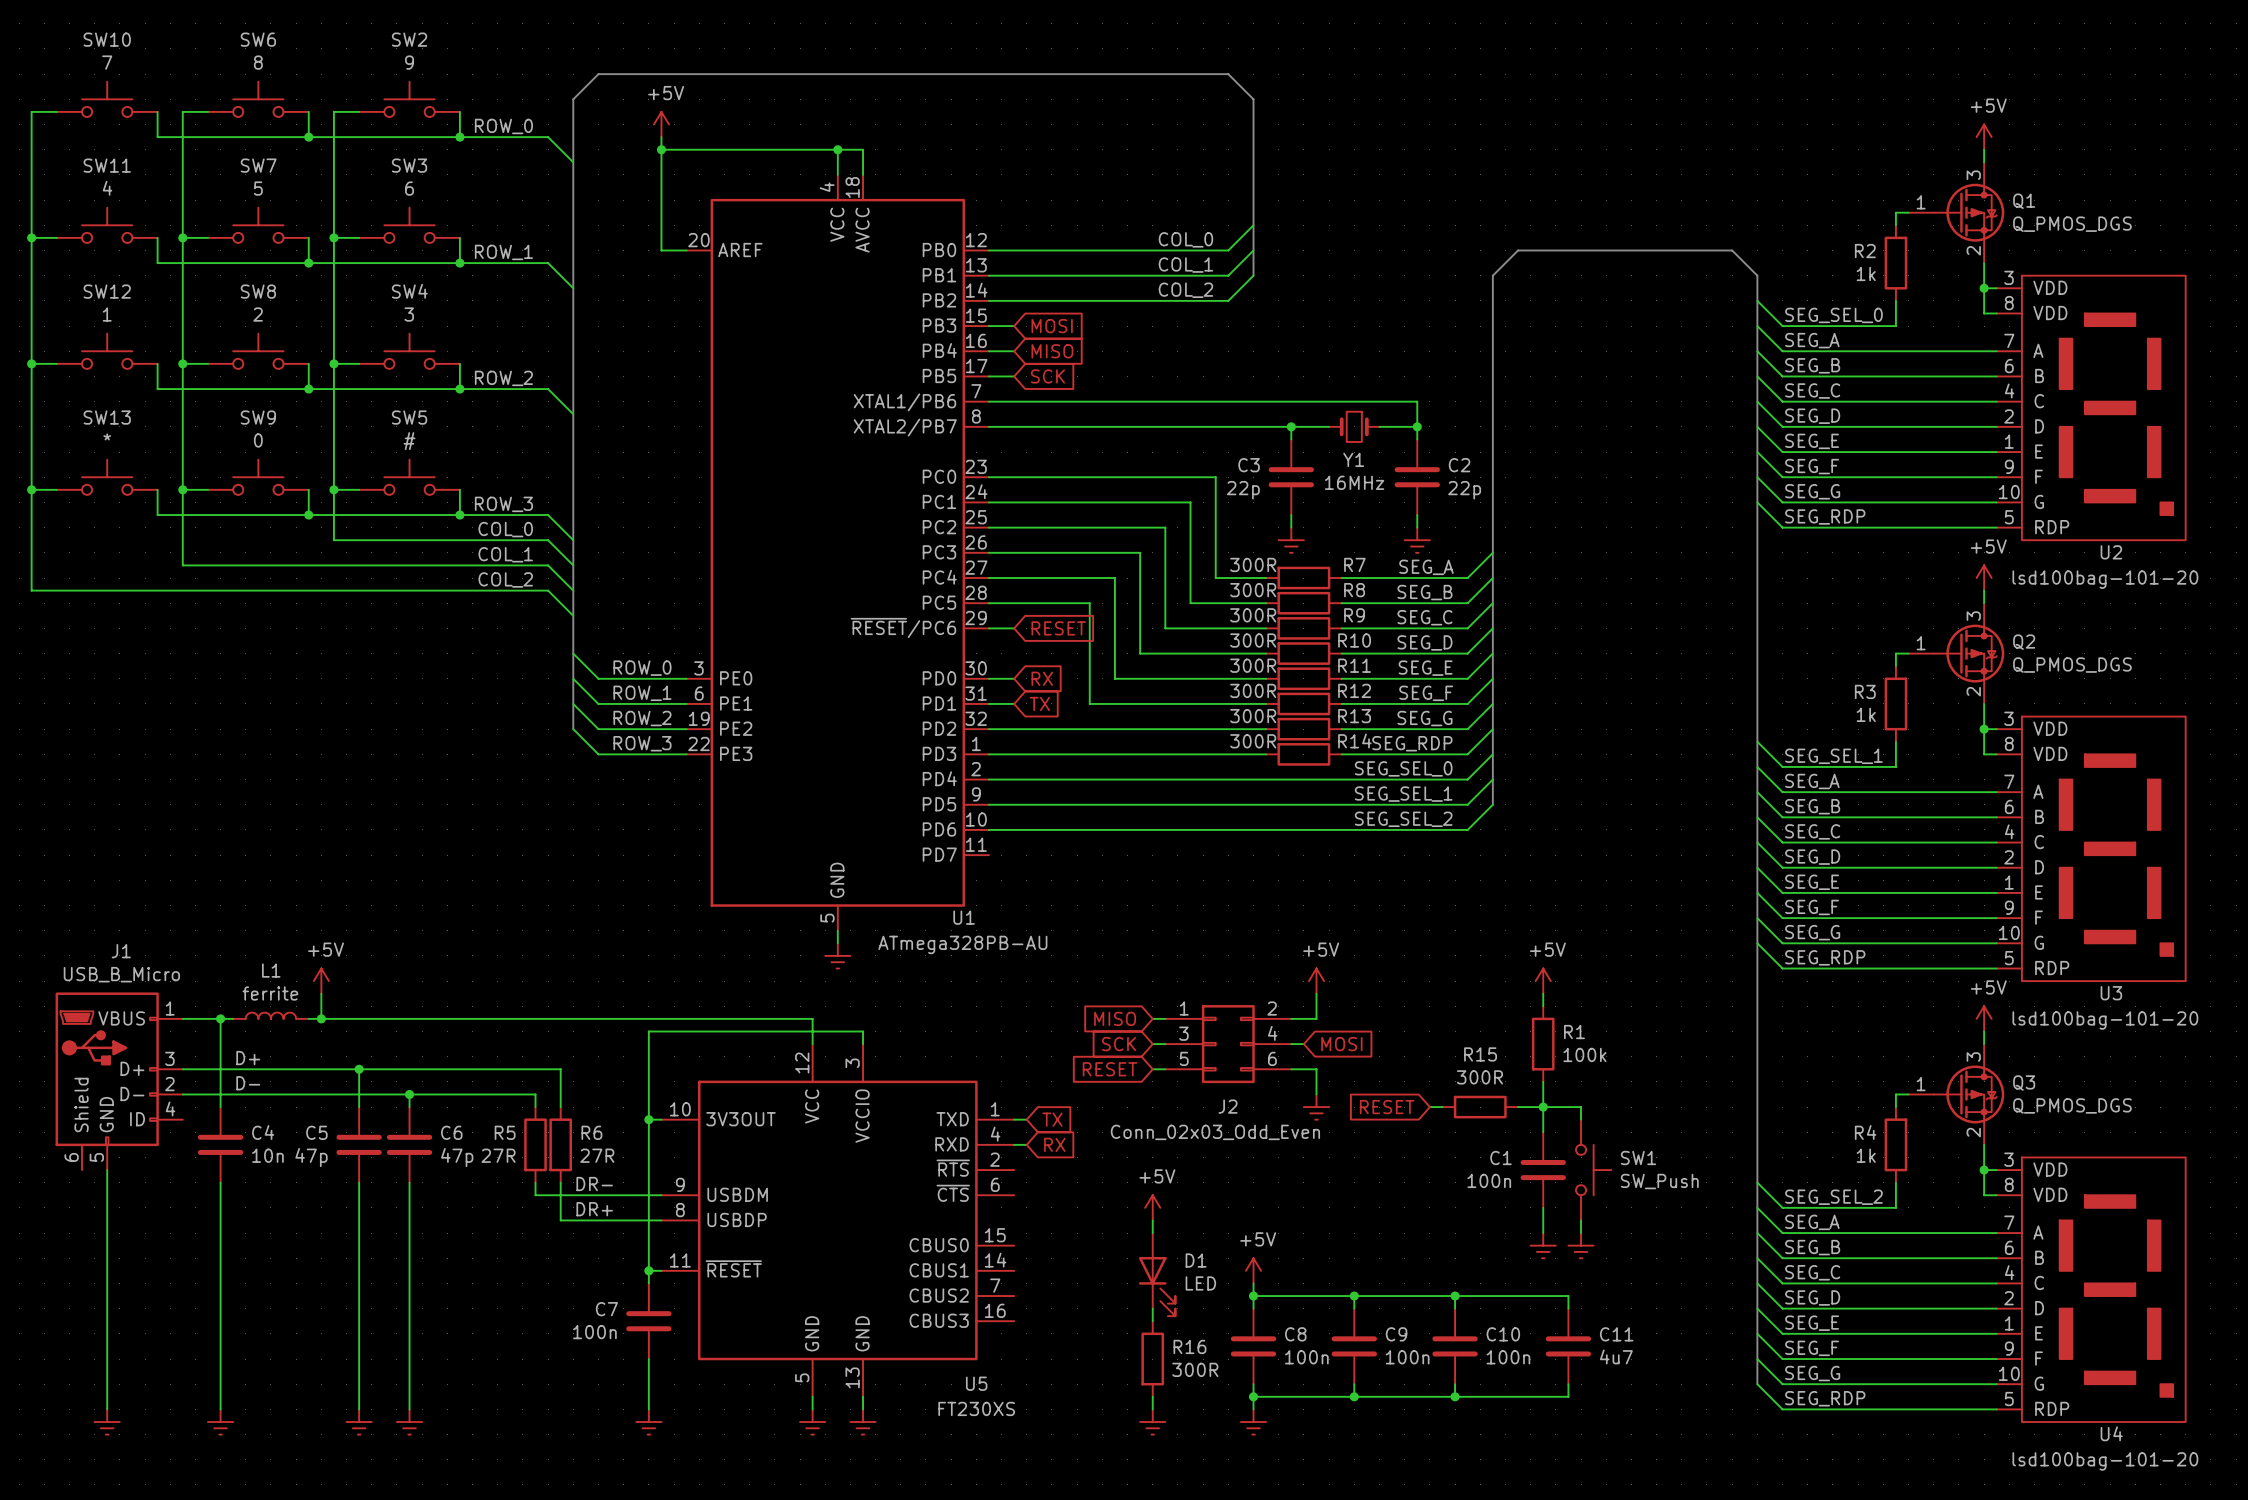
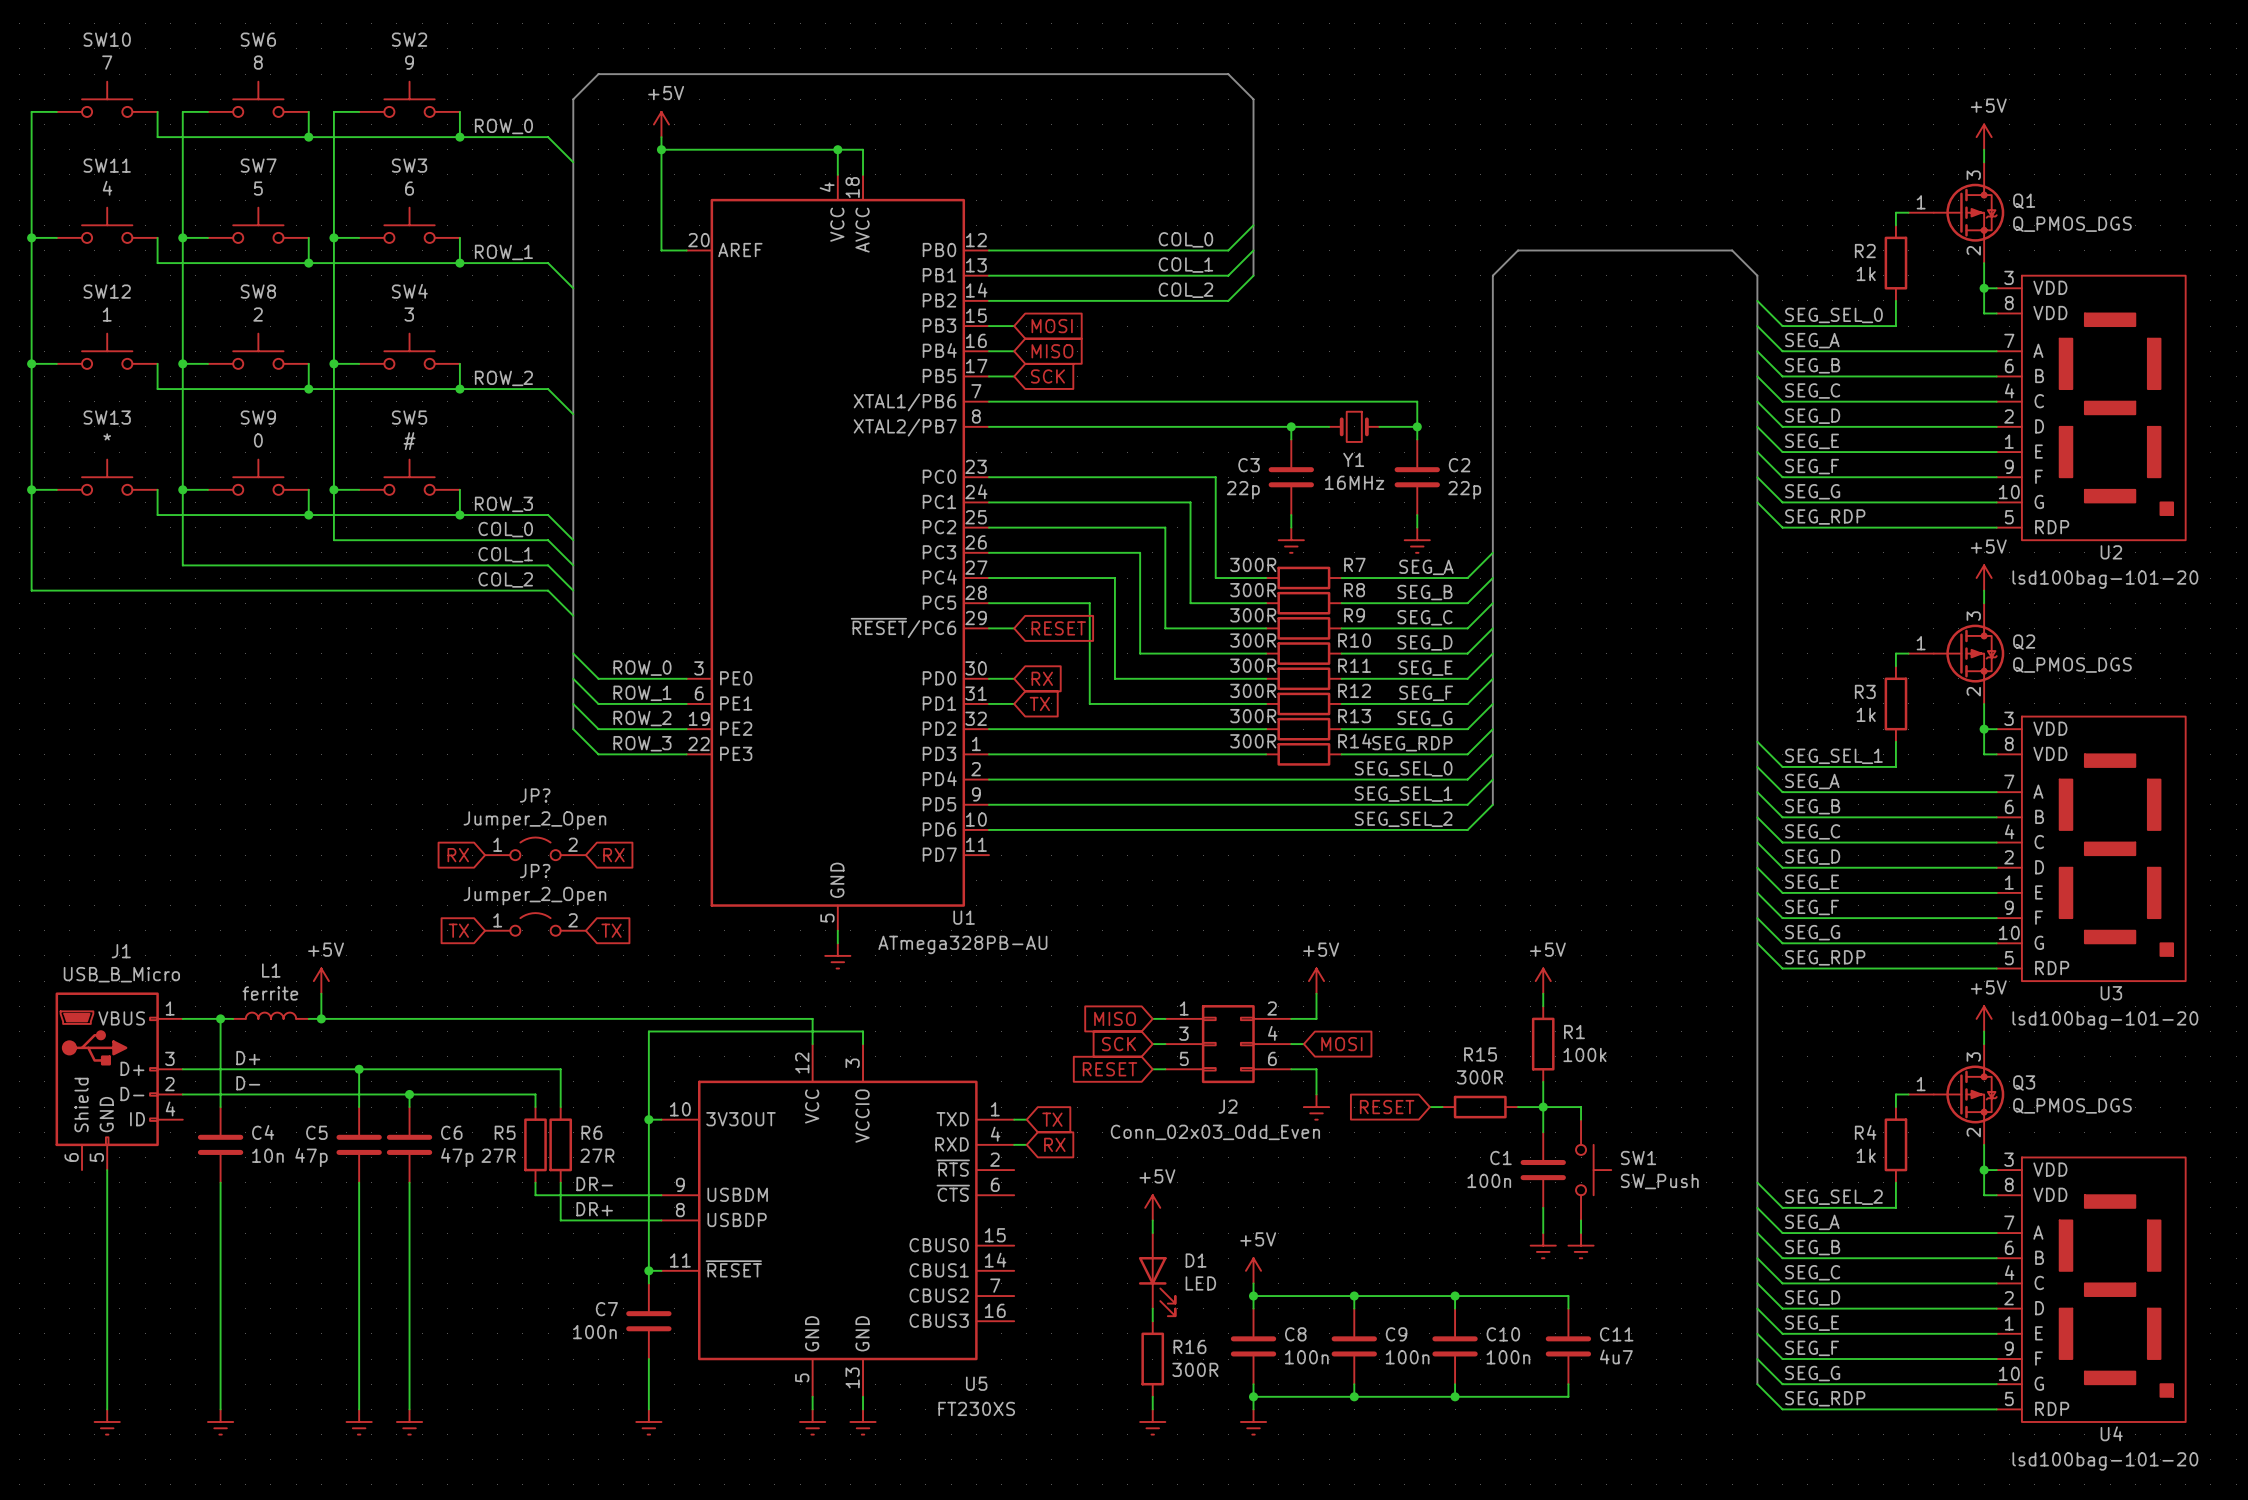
JP?: none -> Jumper_2_Open (535, 848)
global label: none -> RX (458, 855)
global label: none -> RX (613, 855)
JP?: none -> Jumper_2_Open (535, 924)
global label: none -> TX (458, 930)
global label: none -> TX (611, 930)

